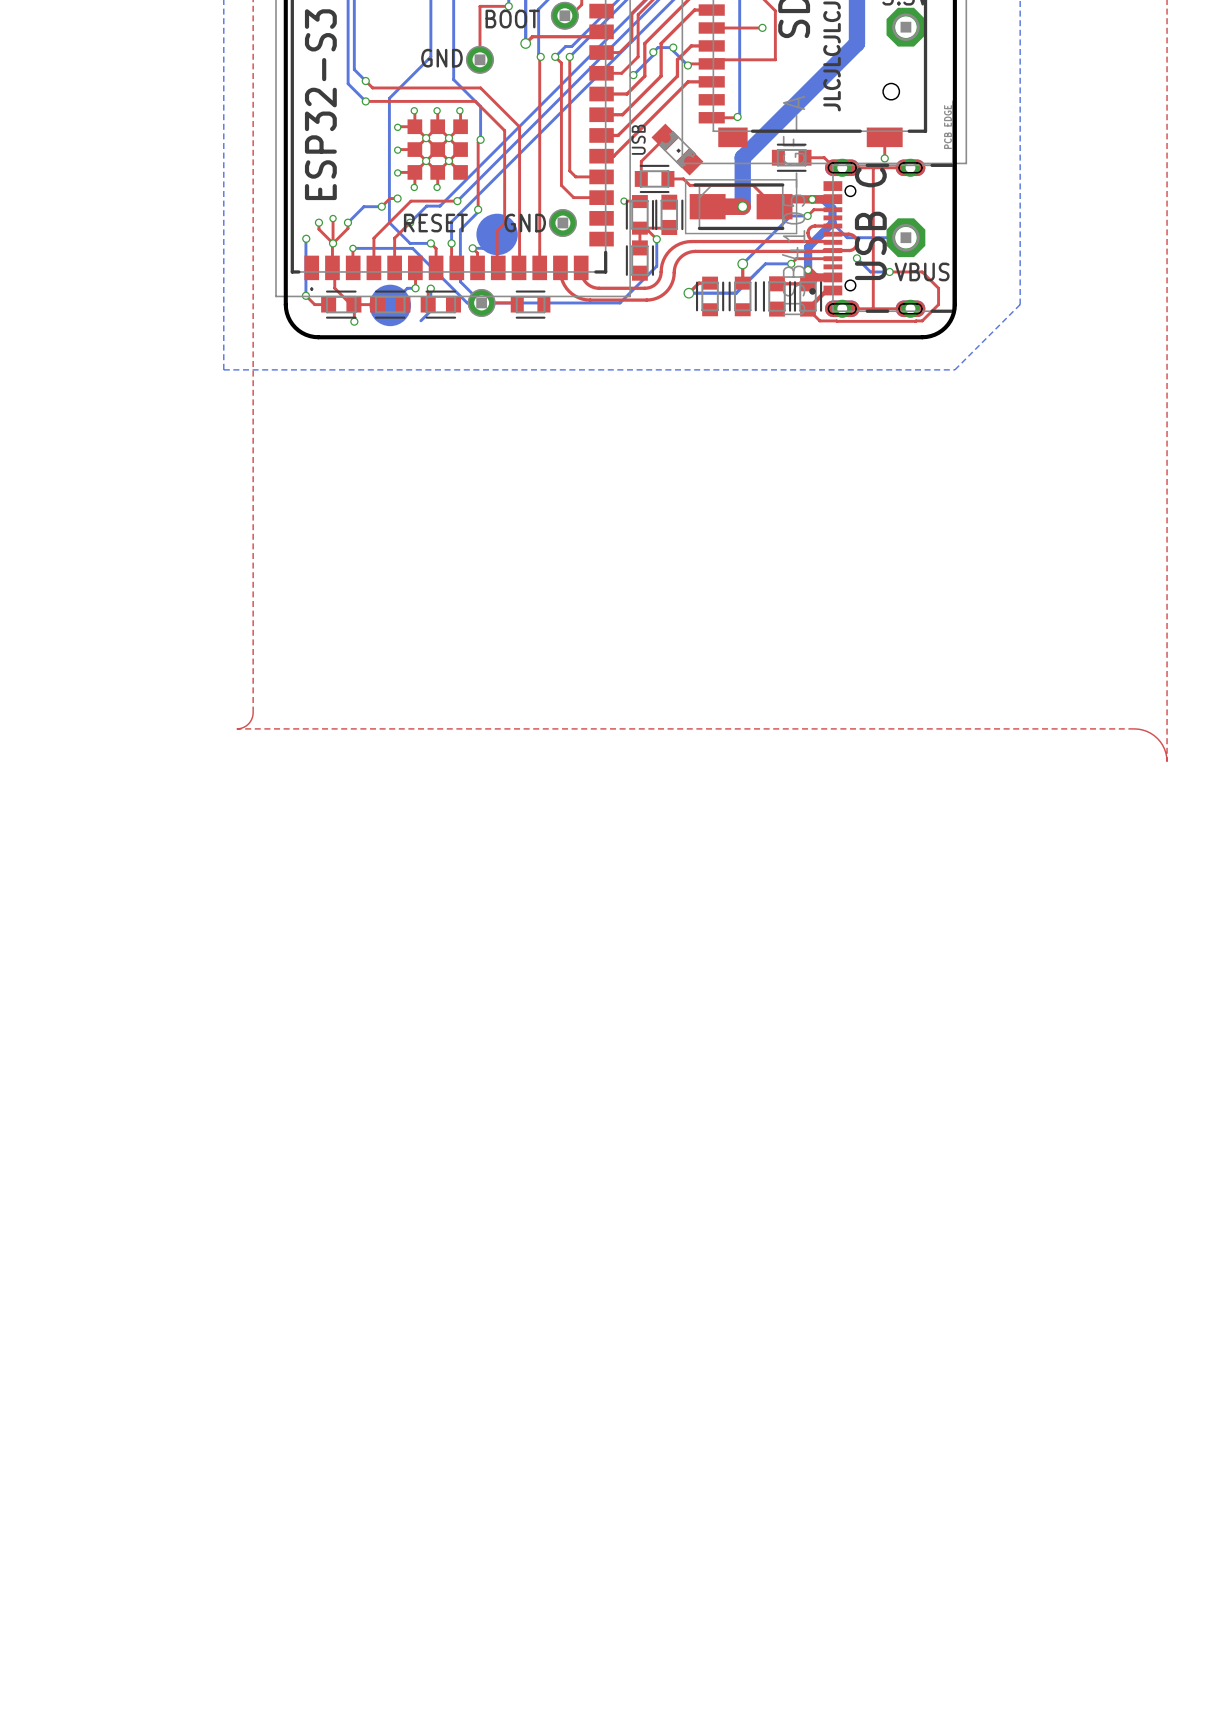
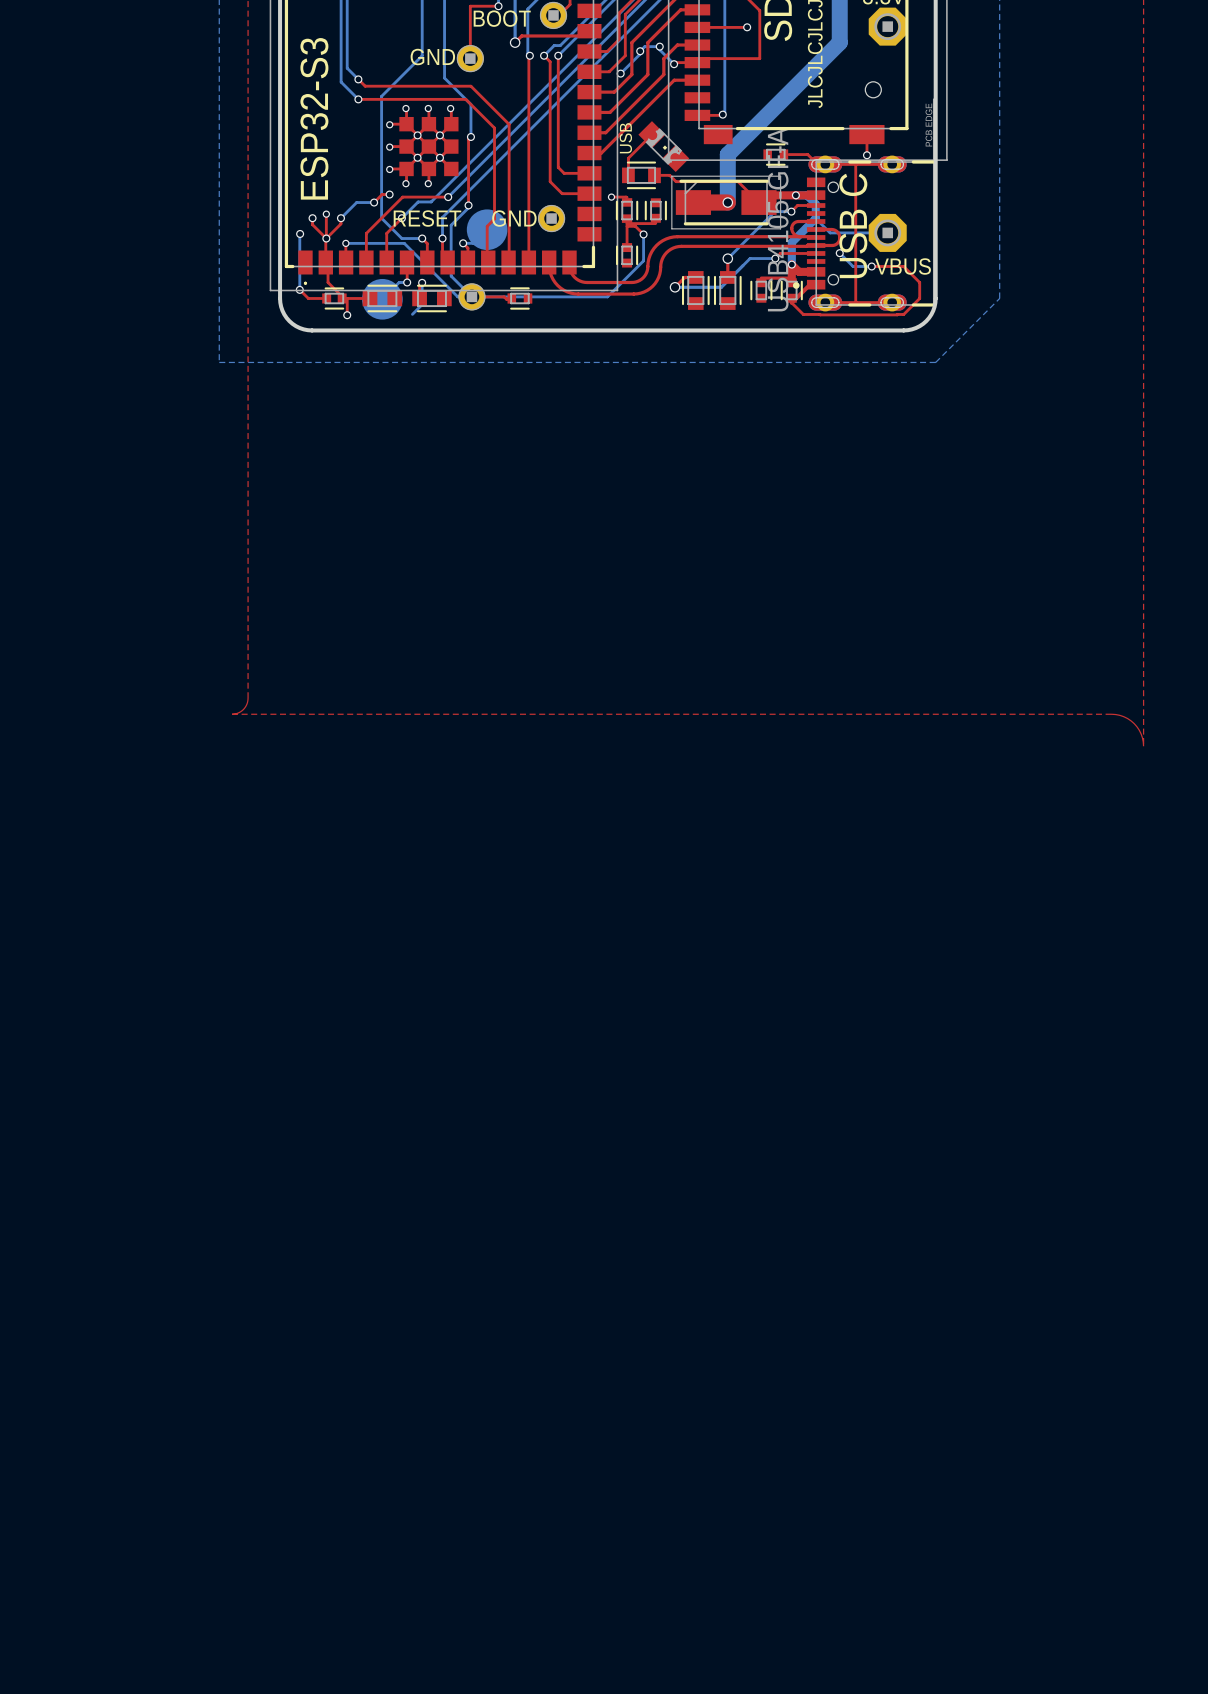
part footprint: [771, 143, 812, 172] -> [763, 143, 789, 166]
part footprint: [655, 194, 684, 236] -> [644, 198, 667, 223]
part footprint: [625, 195, 655, 235] -> [615, 198, 639, 223]
part footprint: [625, 240, 655, 281] -> [615, 243, 639, 268]
part footprint: [762, 276, 792, 317] -> [750, 278, 773, 303]
part footprint: [793, 276, 823, 317] -> [780, 278, 803, 303]
part footprint: [321, 290, 362, 319] -> [322, 287, 347, 310]
part footprint: [510, 290, 551, 319] -> [507, 287, 533, 310]

